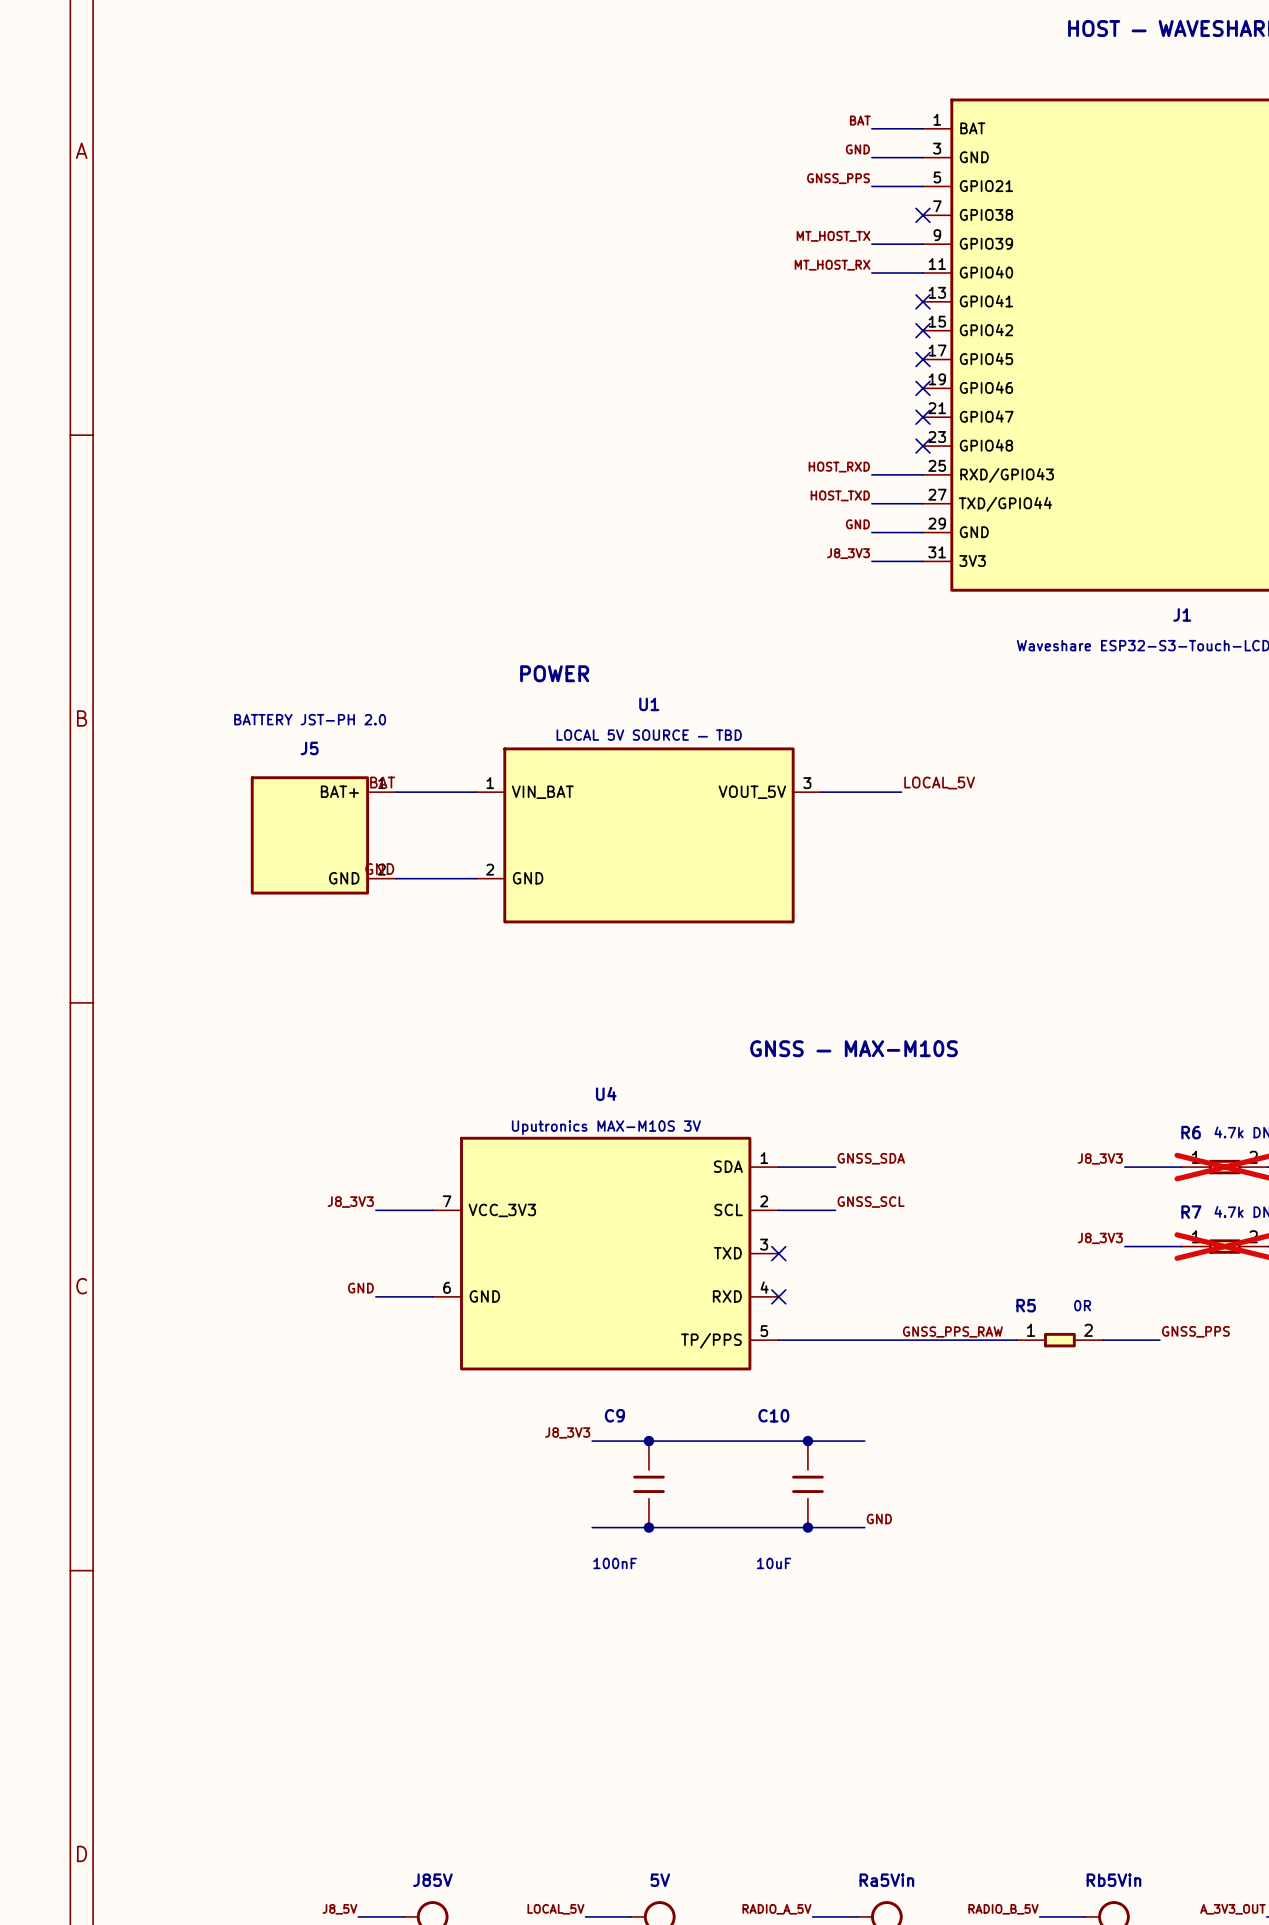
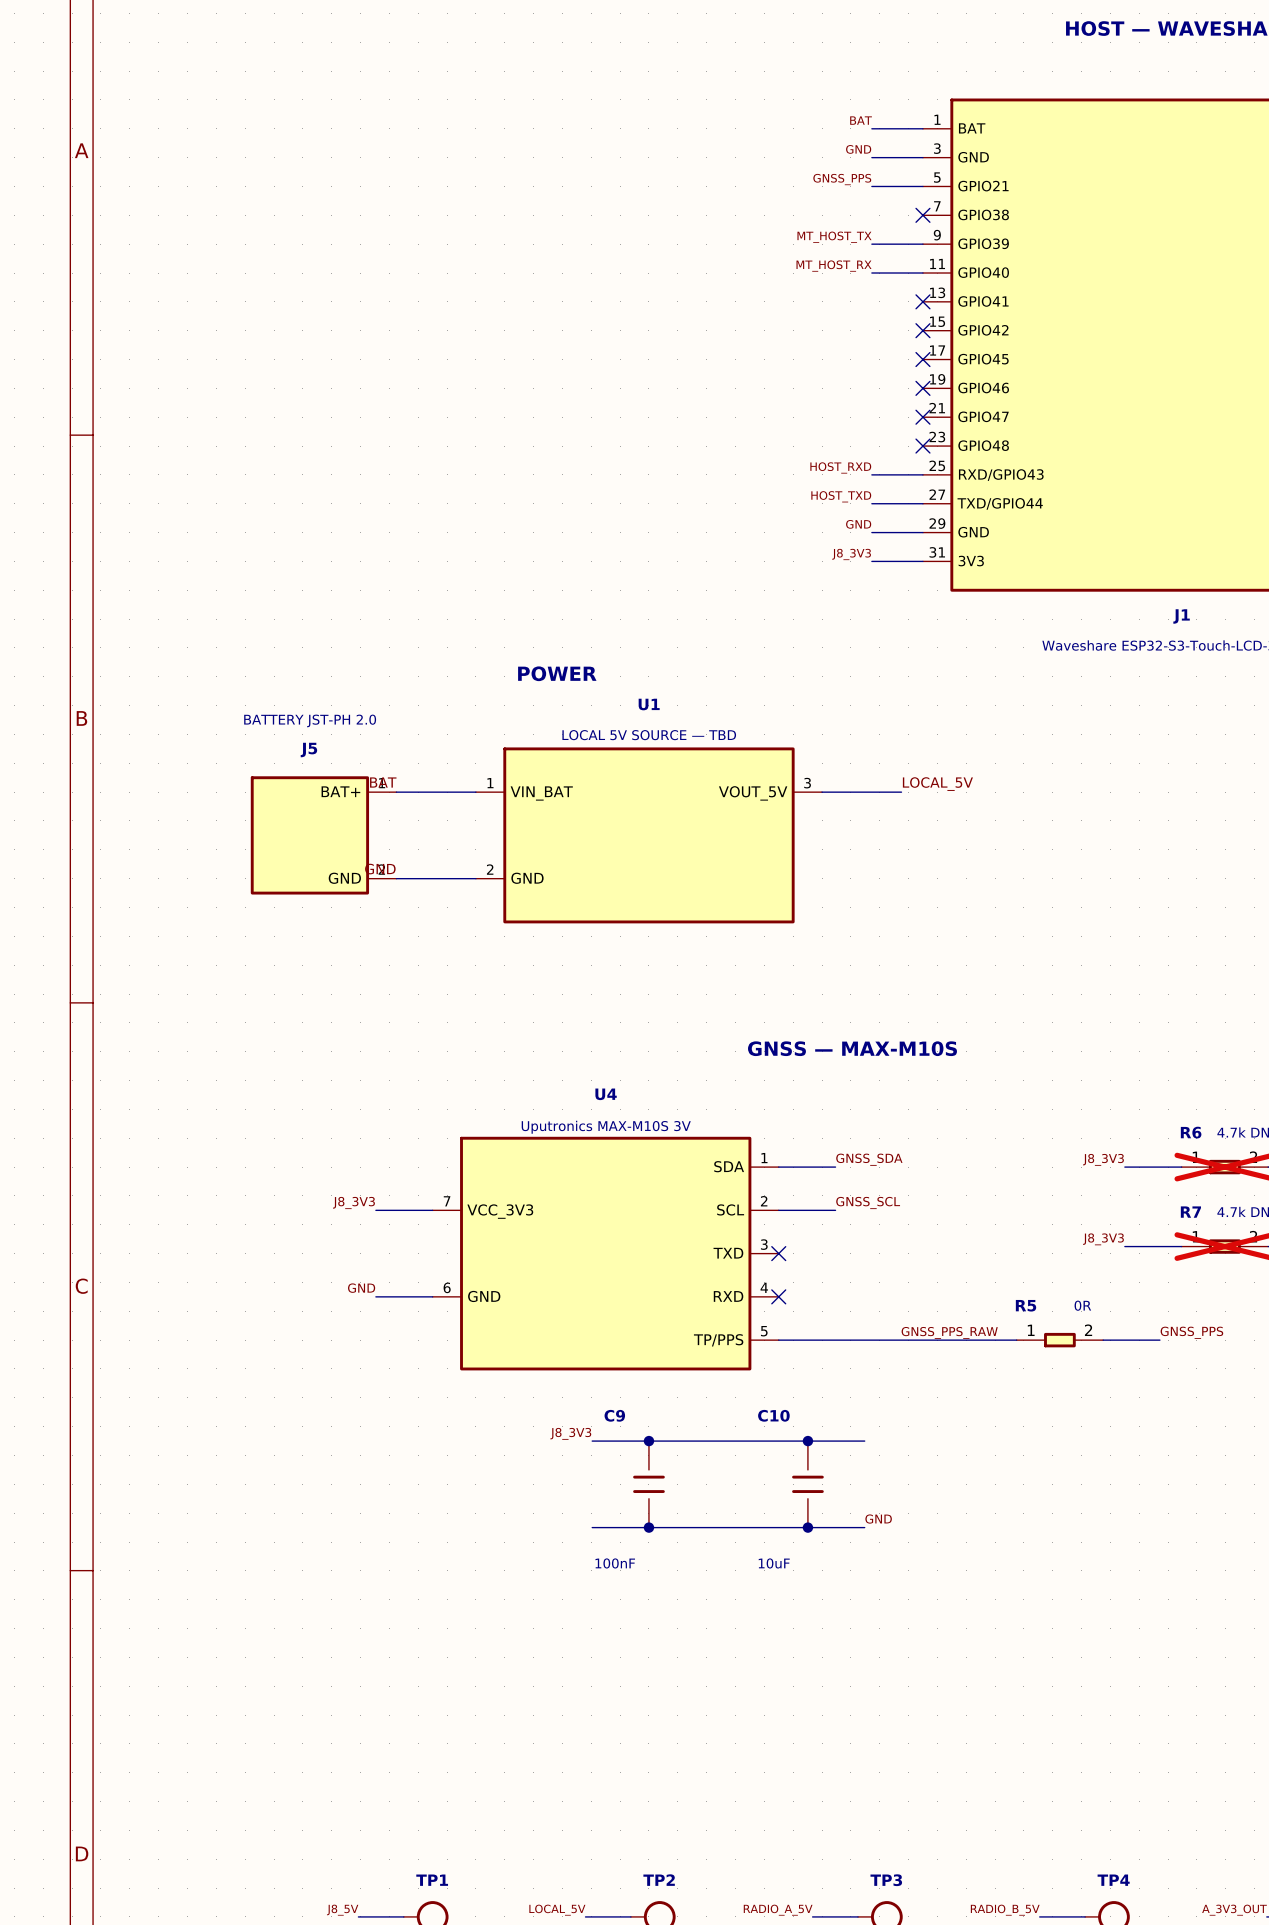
J85V name: J85V (432, 1880) -> TP1 (432, 1880)
5V name: 5V (660, 1880) -> TP2 (659, 1880)
Ra5Vin name: Ra5Vin (886, 1880) -> TP3 (886, 1880)
Rb5Vin name: Rb5Vin (1113, 1880) -> TP4 (1113, 1880)

